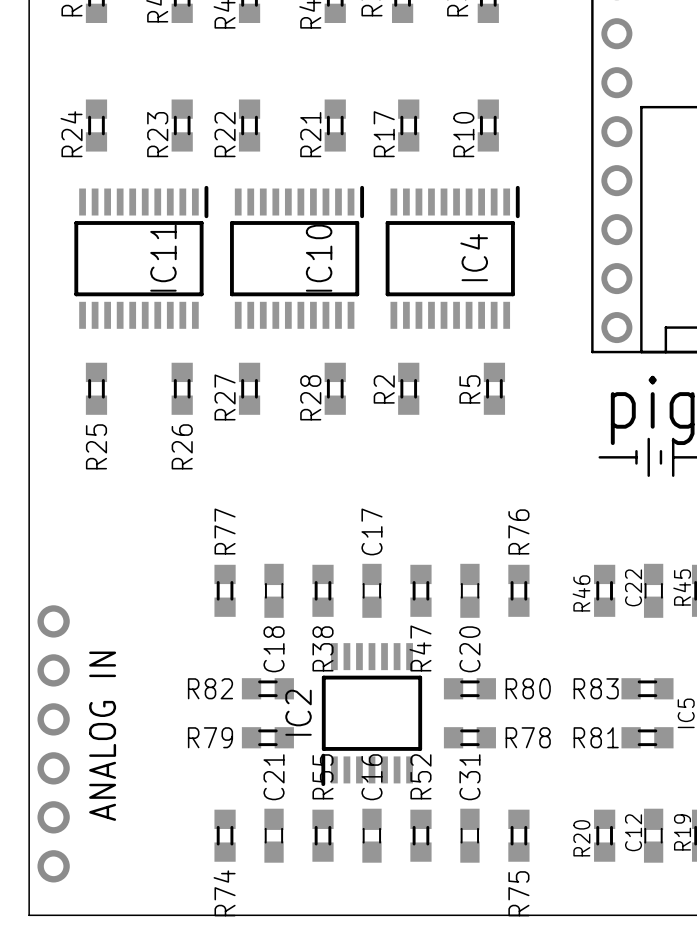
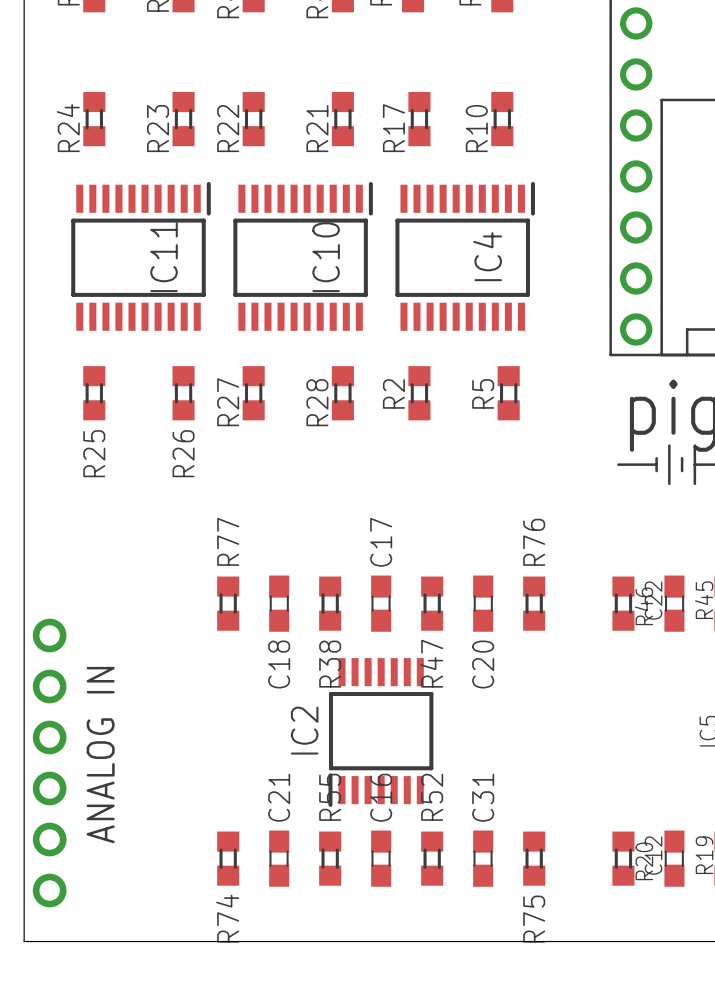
R46 name position: R46 (581, 593) -> R46 (643, 606)
R82: (267, 688) -> none
R80: (469, 688) -> none
R83: (647, 688) -> none
R79: (267, 737) -> none
R78: (469, 737) -> none
R81: (647, 737) -> none
R20 name position: R20 (581, 838) -> R20 (644, 861)

